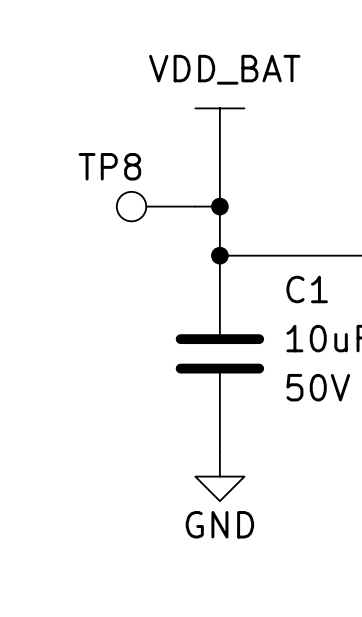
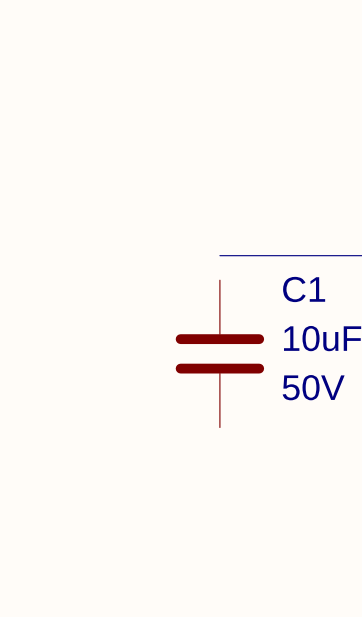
power symbol: VDD_BAT (219, 132) -> none
wire: (219, 157) (219, 280) -> none
TP8: (156, 206) -> none
wire: (195, 206) (219, 206) -> none
junction: (219, 206) -> none
junction: (219, 255) -> none
wire: (219, 427) (219, 452) -> none
power symbol: GND (219, 476) -> none

